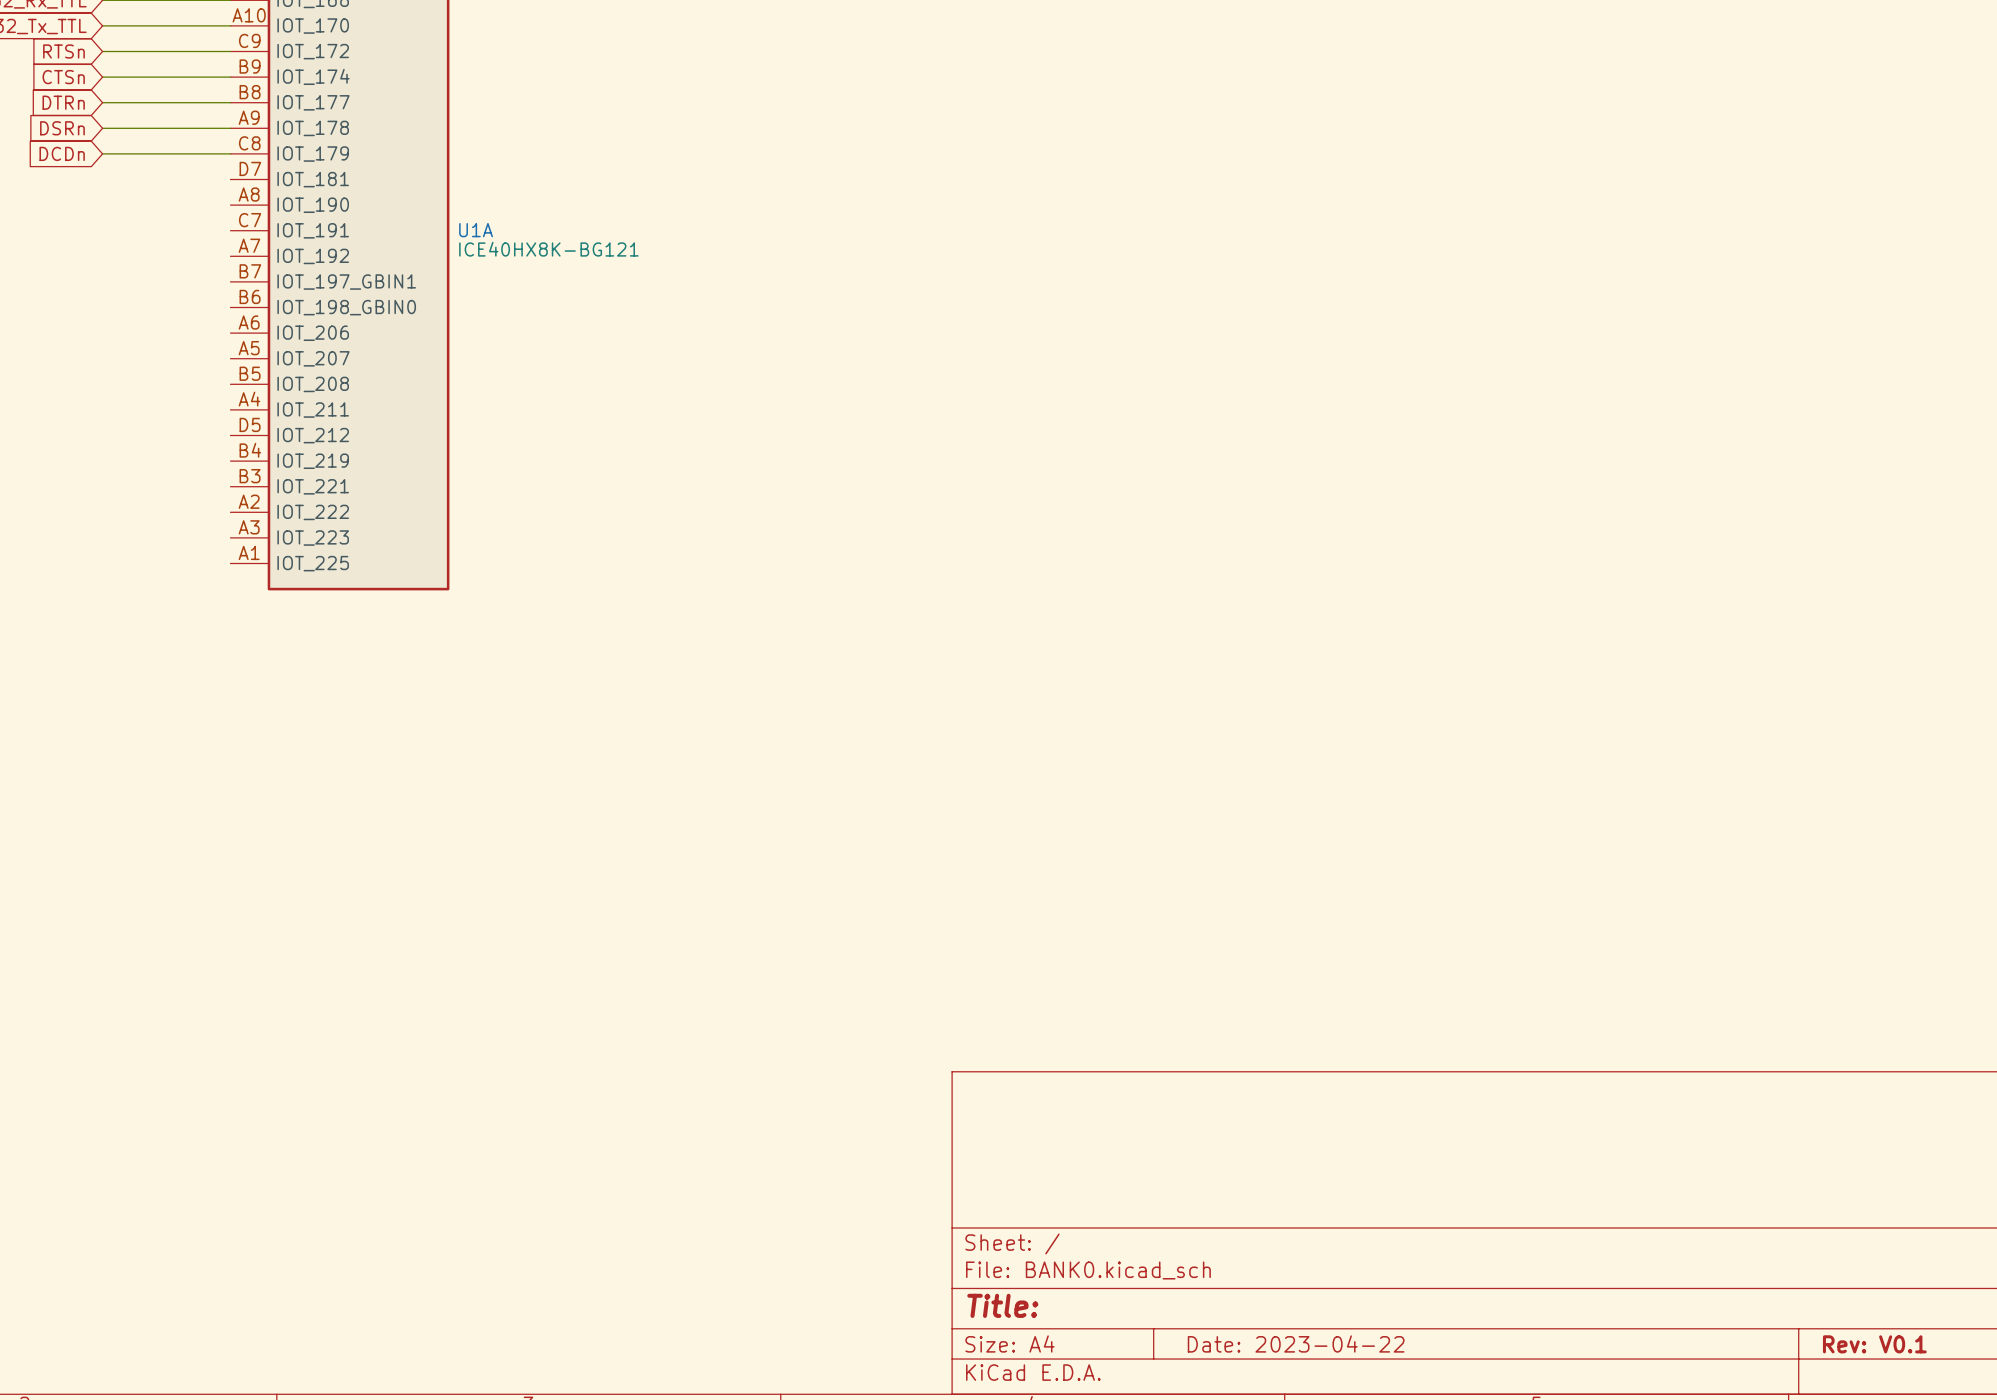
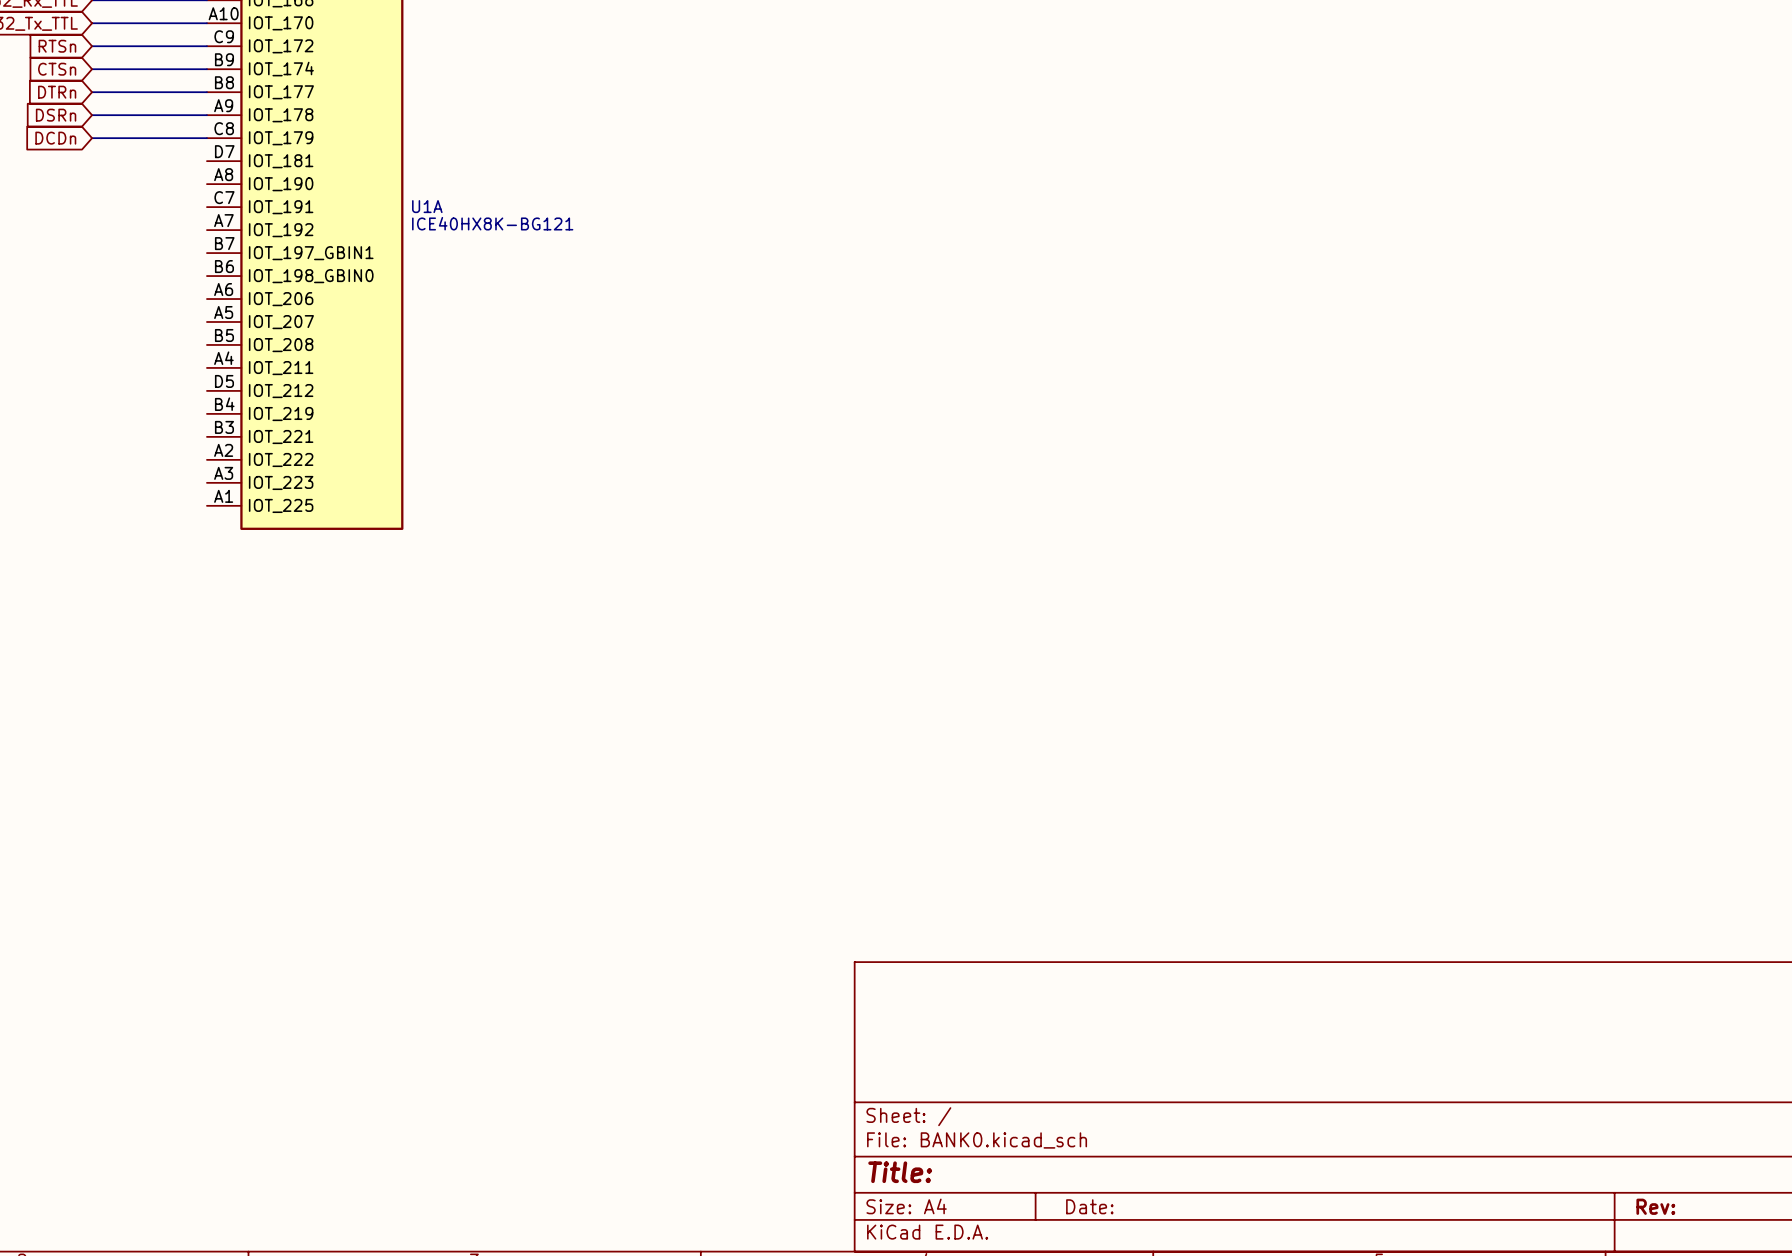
title block: Date: 2023-04-22 (1296, 1343) -> Date: (1089, 1206)
title block: Rev: V0.1 (1874, 1344) -> Rev: (1655, 1206)

